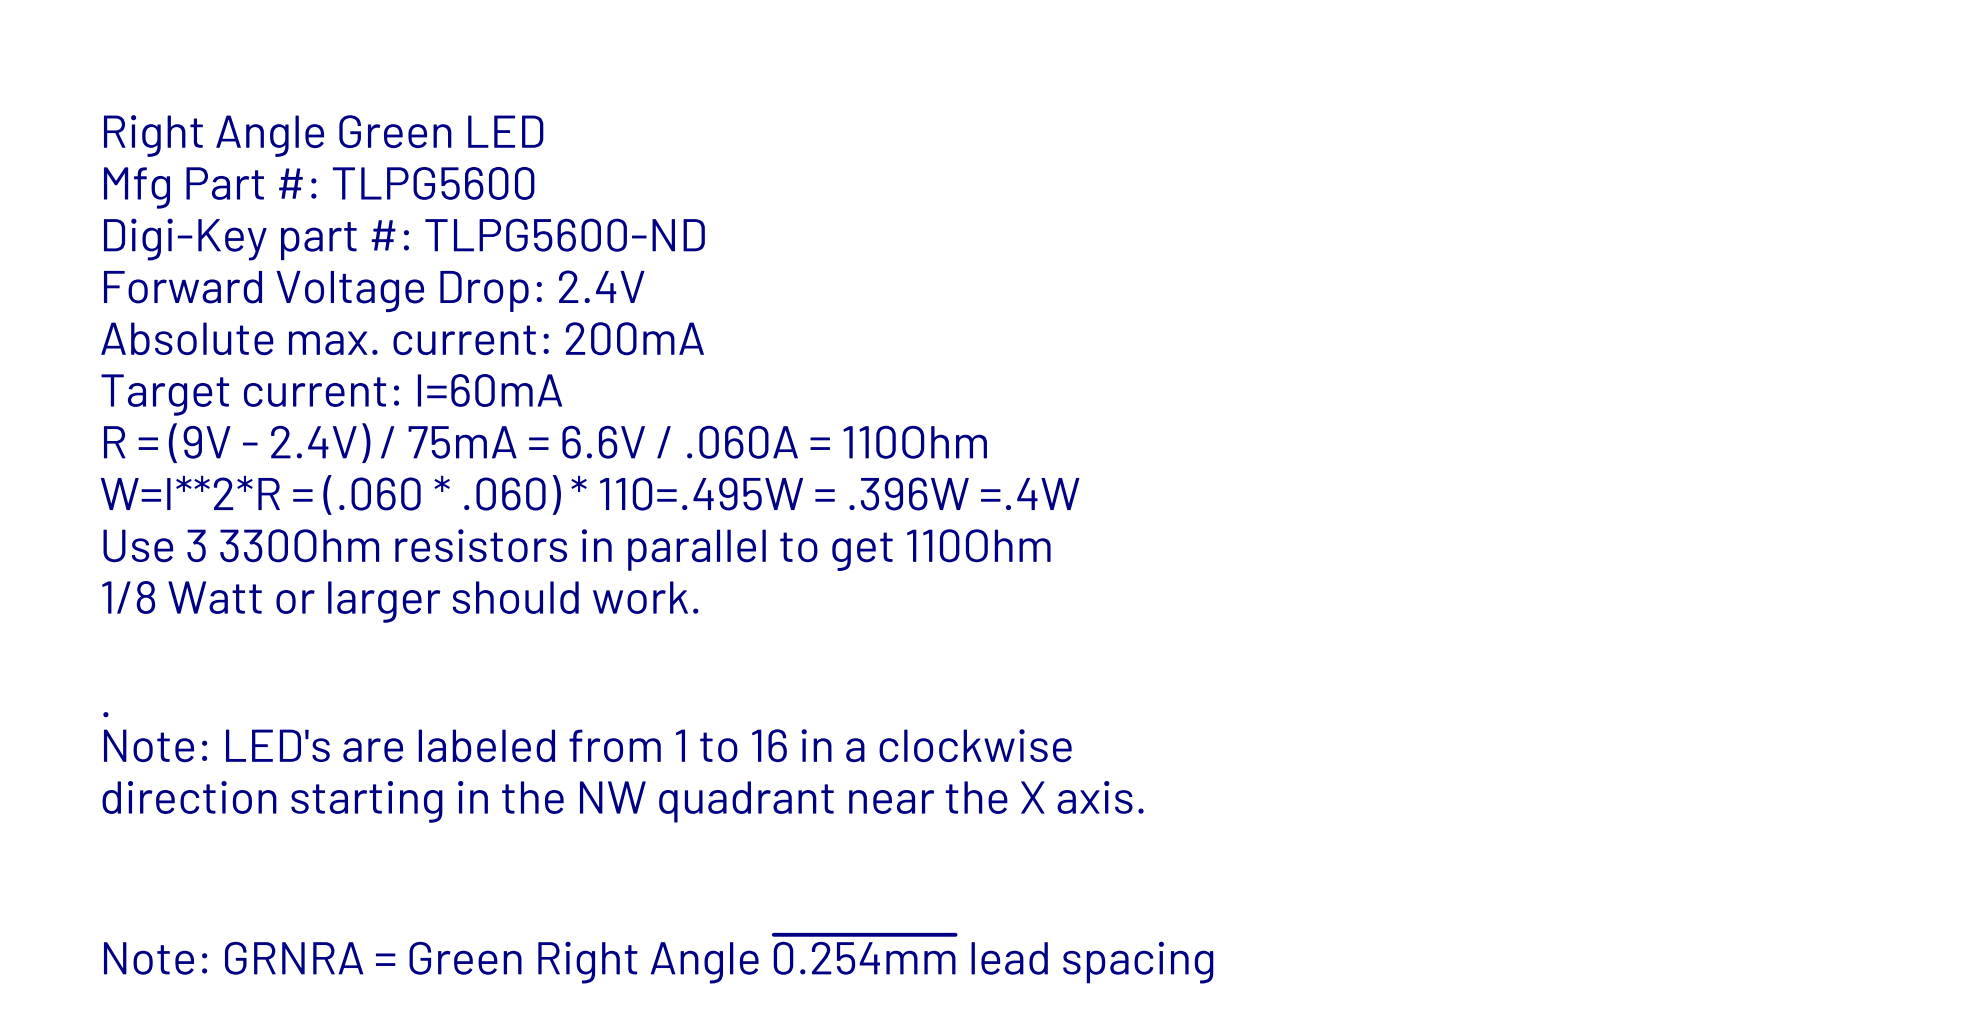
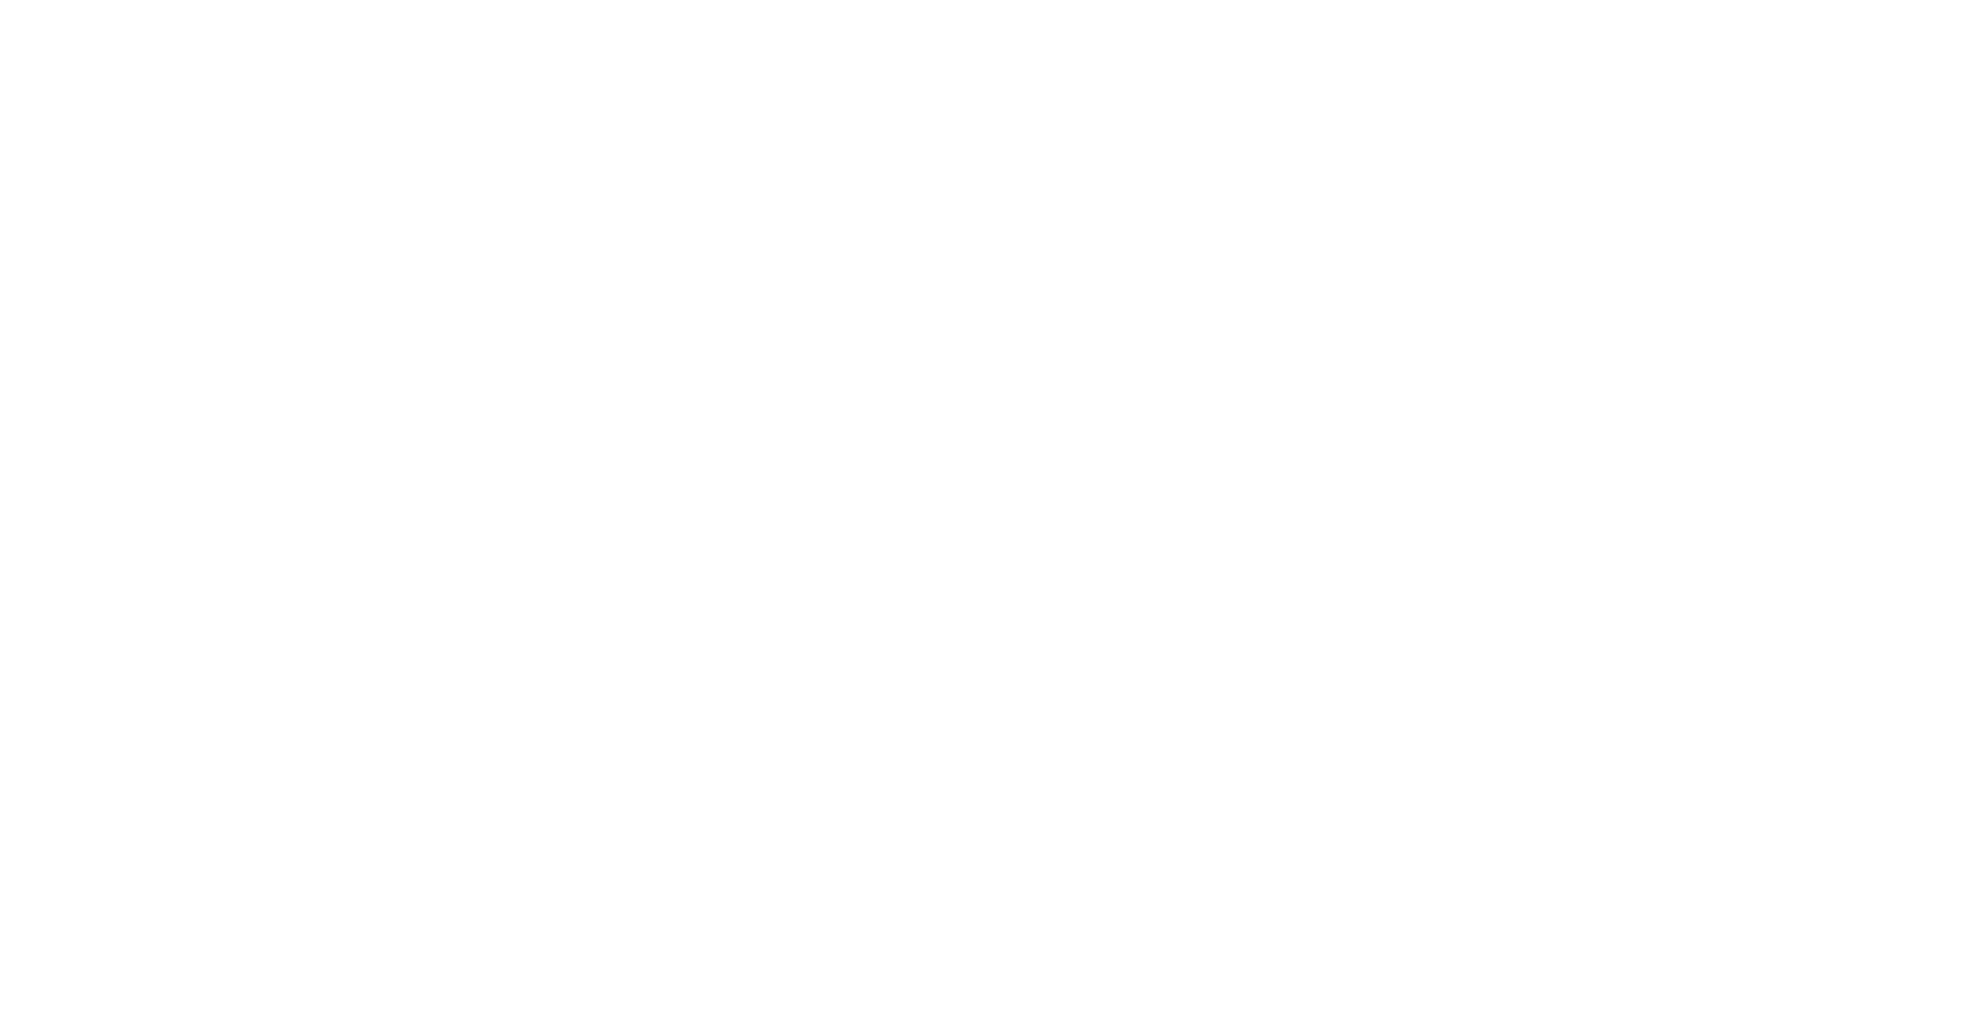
text: Right Angle Green LED (323, 136) -> none
text: Mfg Part #: TLPG5600 (319, 187) -> none
text: Digi-Key part #: TLPG5600-ND (404, 239) -> none
text: Forward Voltage Drop: 2.4V (374, 291) -> none
text: Absolute max. current: 200mA (402, 338) -> none
text: Target current: I=60mA (331, 394) -> none
text: R = (9V - 2.4V) / 75mA = 6.6V / .060A = 110Ohm (545, 443) -> none
text: W=I**2*R = (.060 * .060) * 110=.495W = .396W =.4W (590, 494) -> none
text: Use 3 330Ohm resistors in parallel to get 110Ohm (577, 550) -> none
text: 1/8 Watt or larger should work. (400, 601) -> none
text: . (105, 714) -> none
text: Note: LED's are labeled from 1 to 16 in a clockwise (587, 745) -> none
text: direction starting in the NW quadrant near the X axis. (623, 801) -> none
text: Note: GRNRA = Green Right Angle ~{0.254mm} lead spacing (658, 959) -> none

